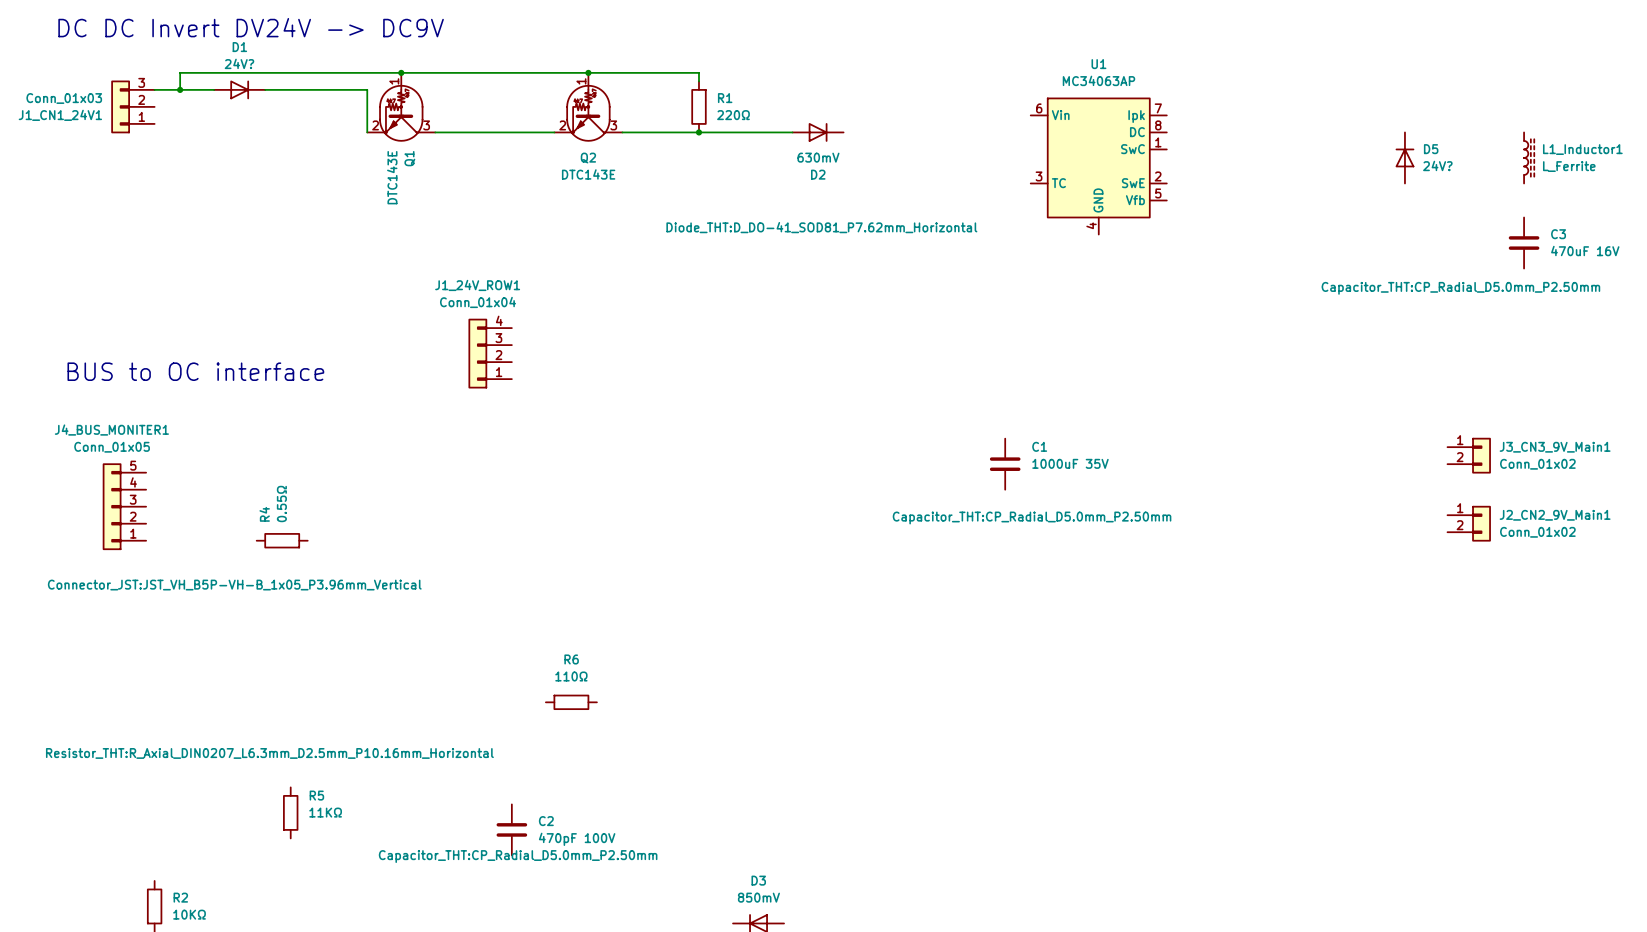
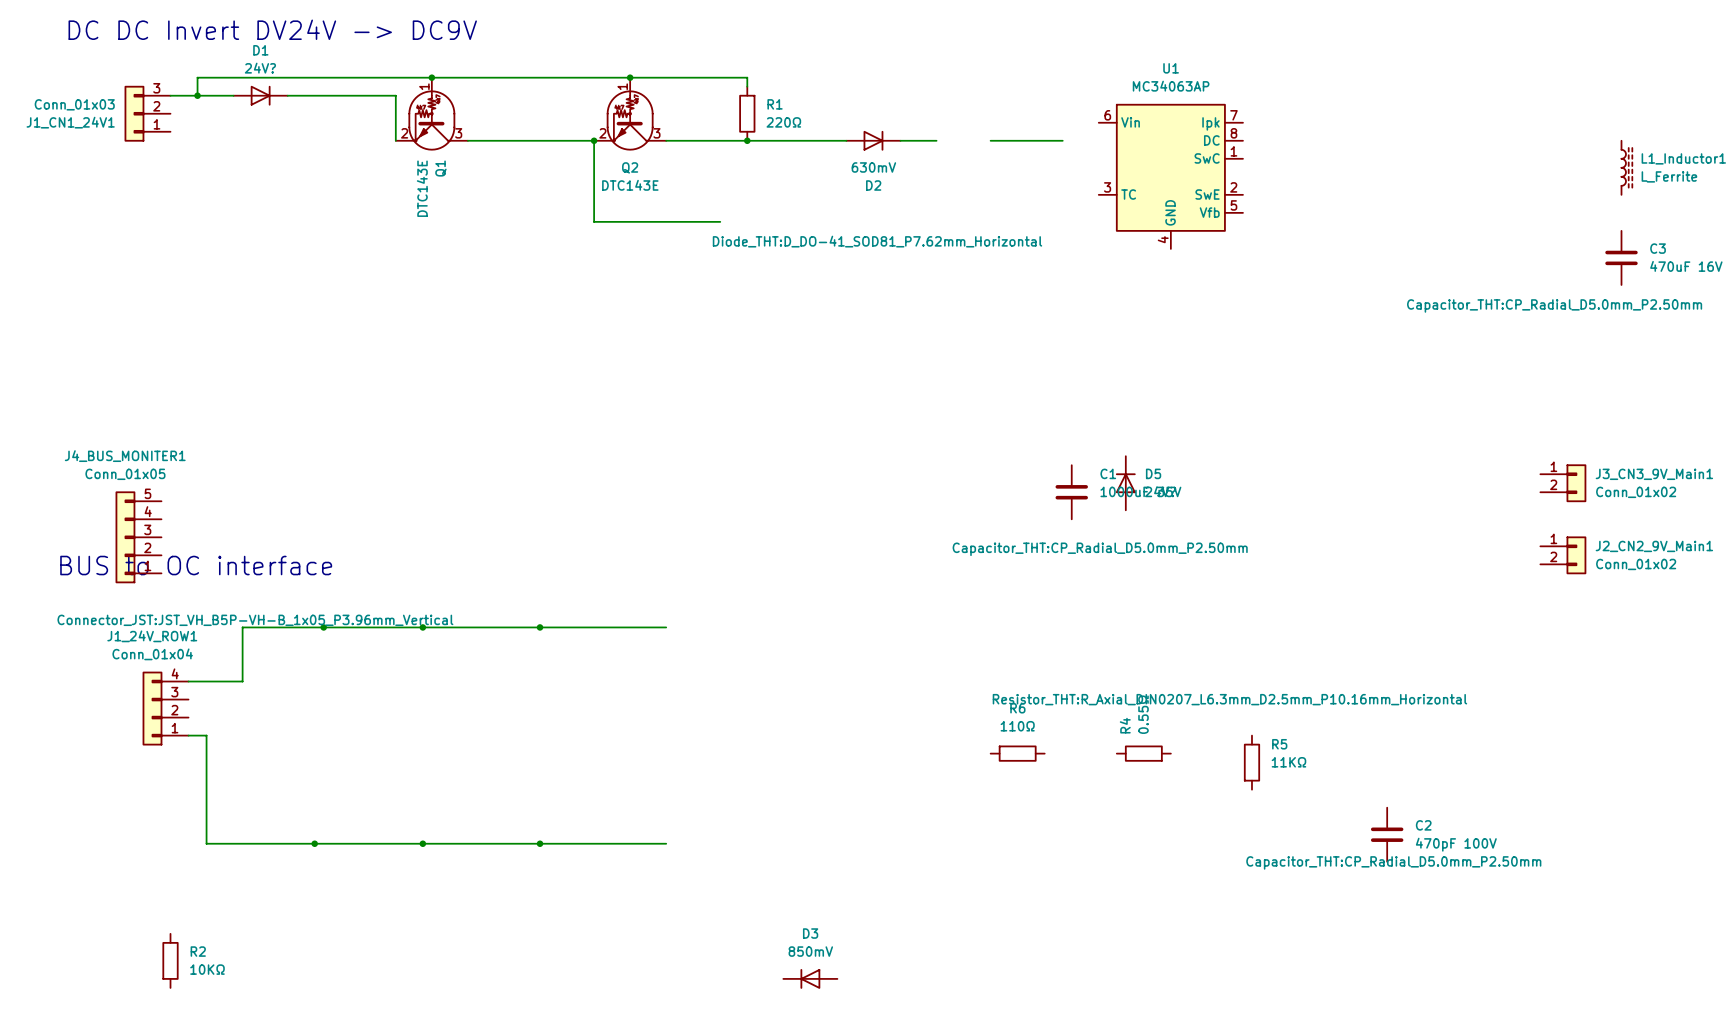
wire: none -> (594, 140) (594, 221) (720, 221)
junction: none -> (594, 140)
wire: none -> (900, 140) (936, 140)
wire: none -> (990, 140) (1062, 140)
D5 position: (1404, 157) -> (1125, 483)
J1_24V_ROW1 position: (490, 353) -> (165, 708)
text position: BUS to OC interface (195, 371) -> BUS to OC interface (196, 565)
R4 position: (282, 540) -> (1143, 753)
junction: none -> (323, 627)
junction: none -> (422, 627)
junction: none -> (540, 627)
wire: none -> (666, 627) (242, 627) (242, 681) (188, 681)
wire: none -> (188, 735) (206, 735) (206, 843) (666, 843)
R6 position: (571, 702) -> (1017, 753)
junction: none -> (314, 843)
junction: none -> (422, 843)
junction: none -> (540, 843)
R5 position: (290, 812) -> (1251, 762)
C2 position: (511, 829) -> (1387, 834)

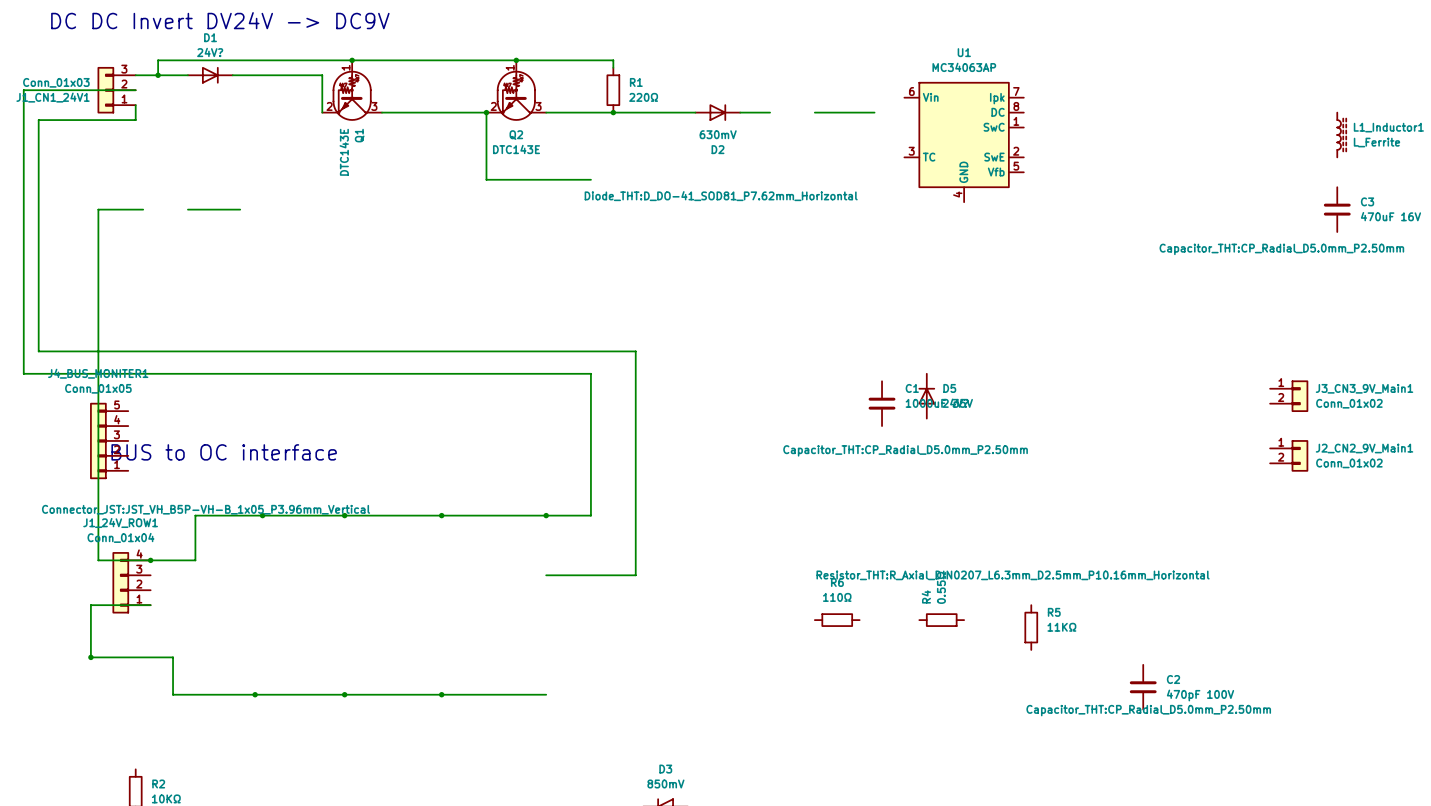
wire: none -> (135, 90) (23, 90) (23, 373) (590, 373) (590, 515) (546, 515)
wire: none -> (135, 105) (135, 120) (38, 120) (38, 351) (635, 351) (635, 575) (546, 575)
wire: none -> (143, 209) (98, 209) (98, 560) (150, 560)
wire: none -> (187, 209) (240, 209)
text position: BUS to OC interface (196, 565) -> BUS to OC interface (224, 452)
junction: none -> (546, 515)
junction: none -> (150, 560)
wire: (188, 735) (206, 735) (206, 843) (215, 843) -> (150, 605) (90, 605) (90, 657) (173, 657) (173, 694)
junction: none -> (90, 657)

